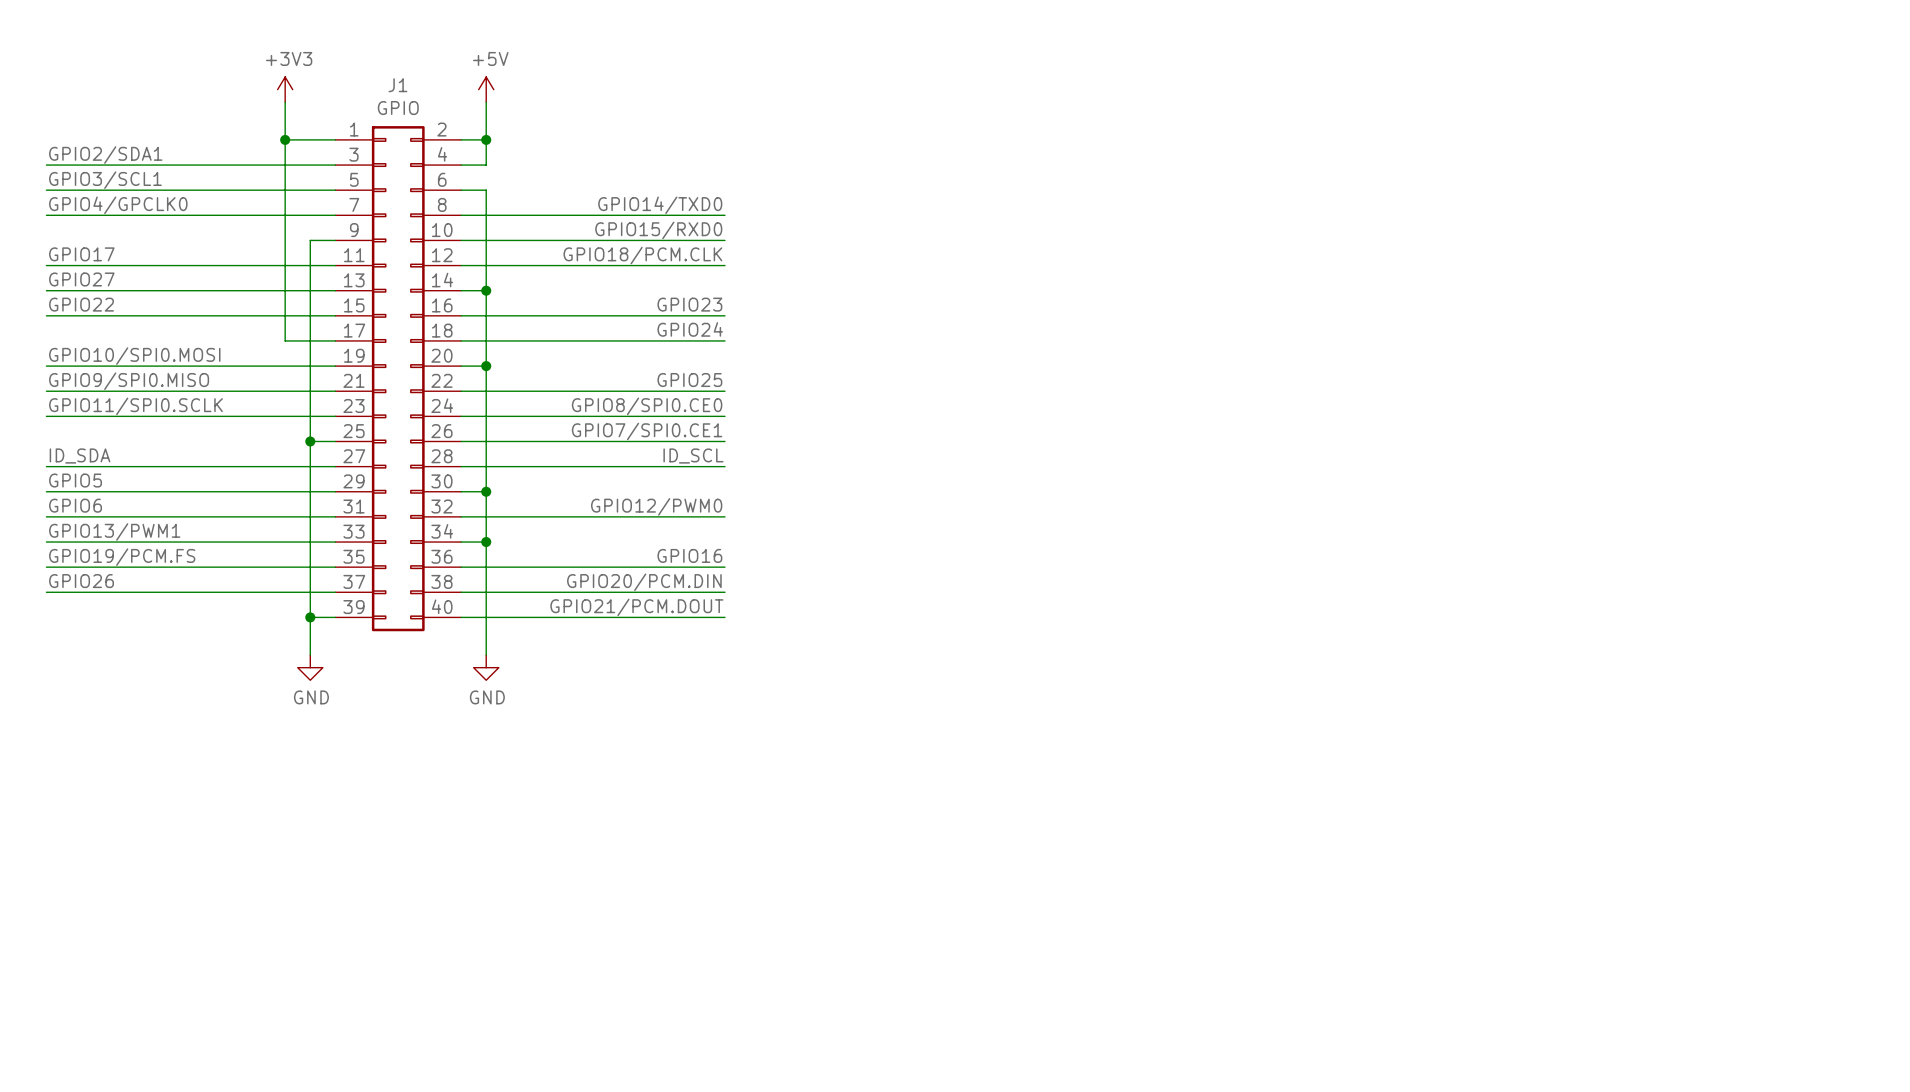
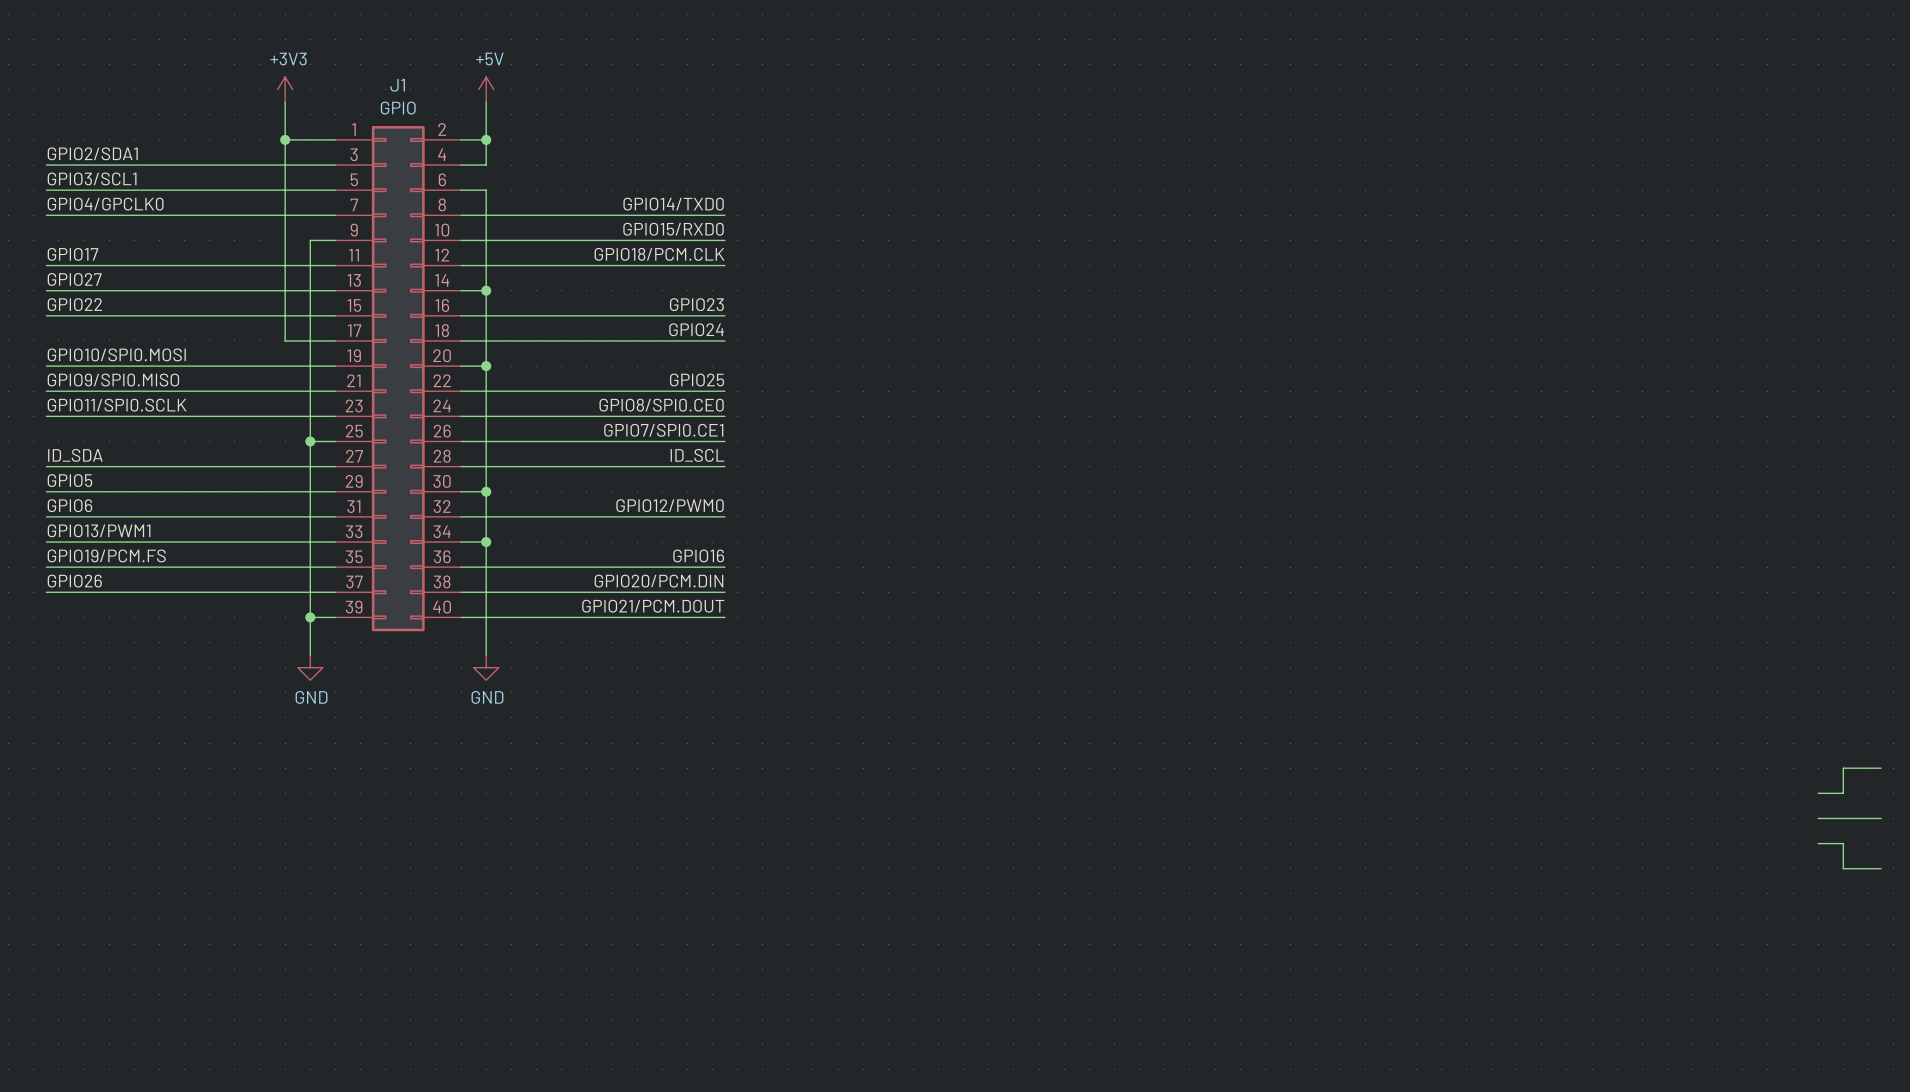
wire: none -> (1881, 768) (1843, 768) (1843, 793) (1818, 793)
wire: none -> (1818, 818) (1881, 818)
wire: none -> (1818, 843) (1843, 843) (1843, 868) (1881, 868)

